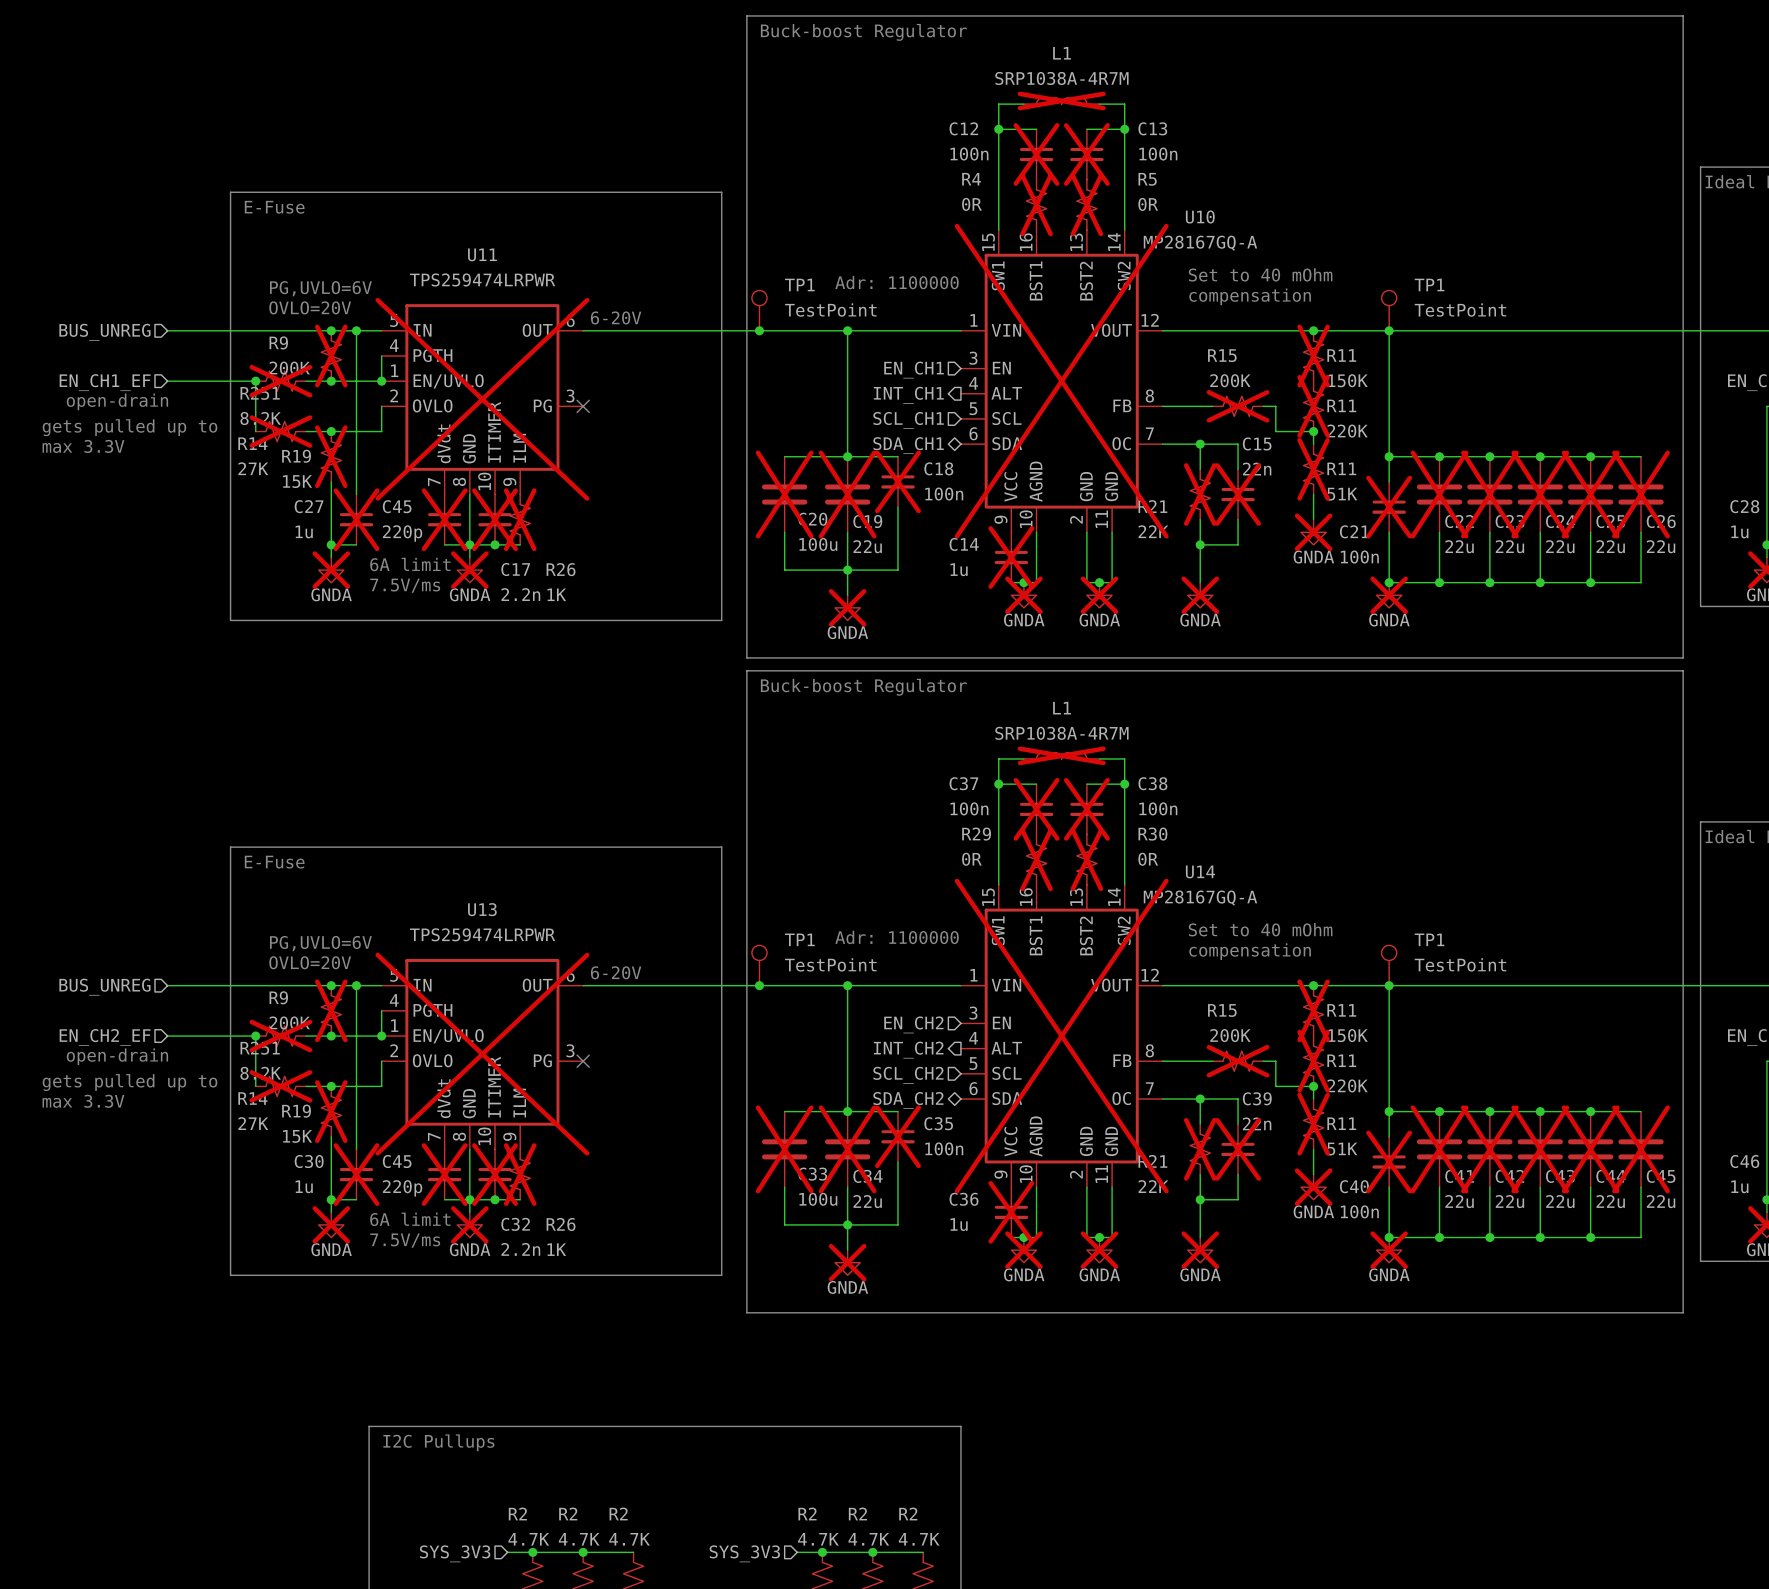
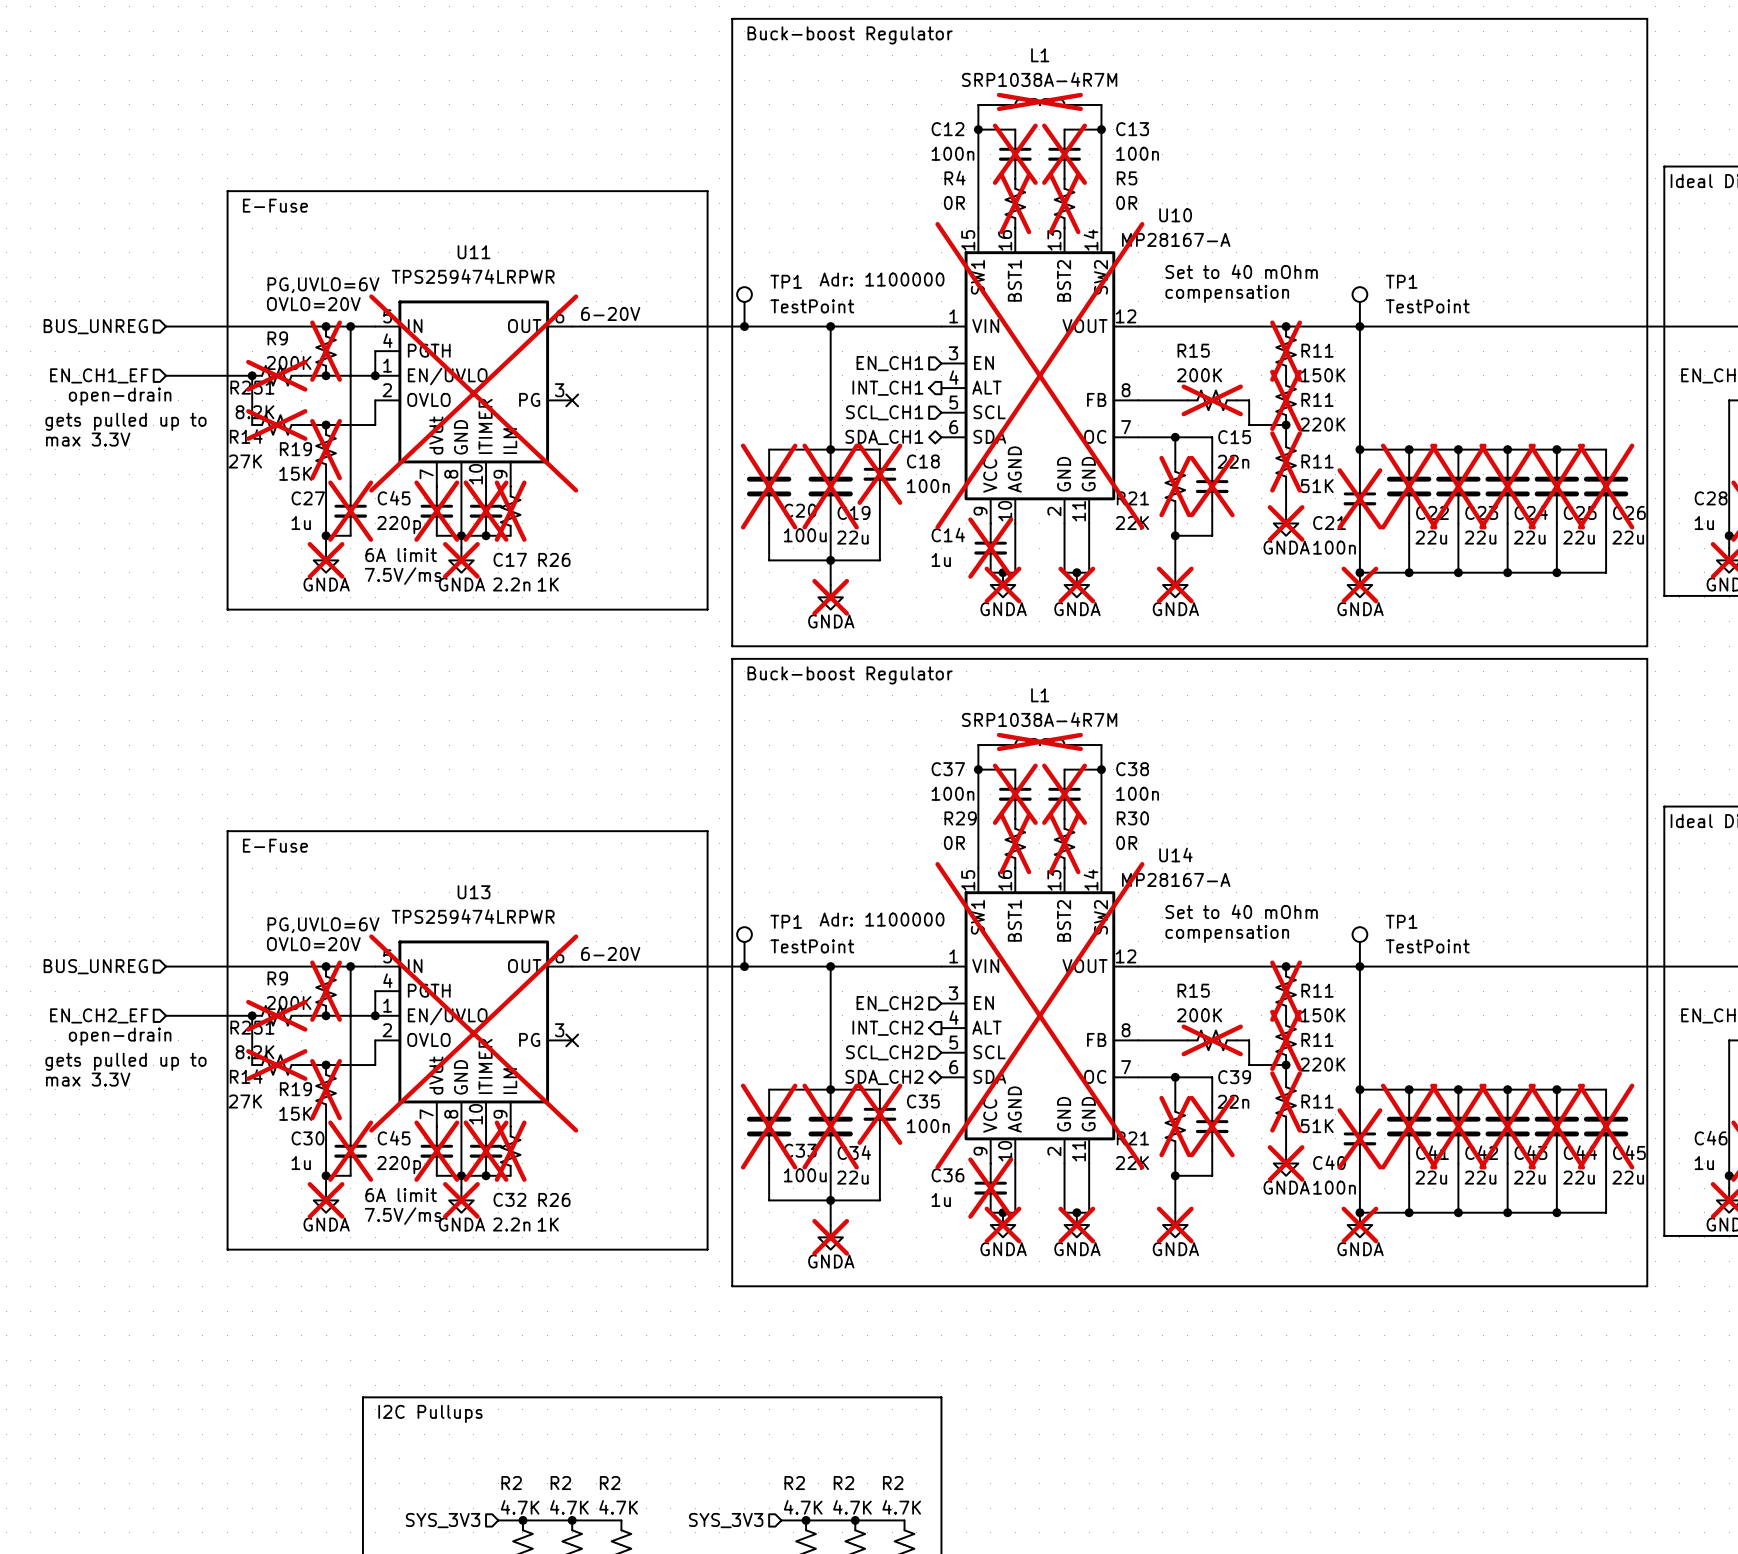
U10 value: MP28167GQ-A (1200, 243) -> MP28167-A (1176, 239)
U14 value: MP28167GQ-A (1200, 898) -> MP28167-A (1176, 879)

